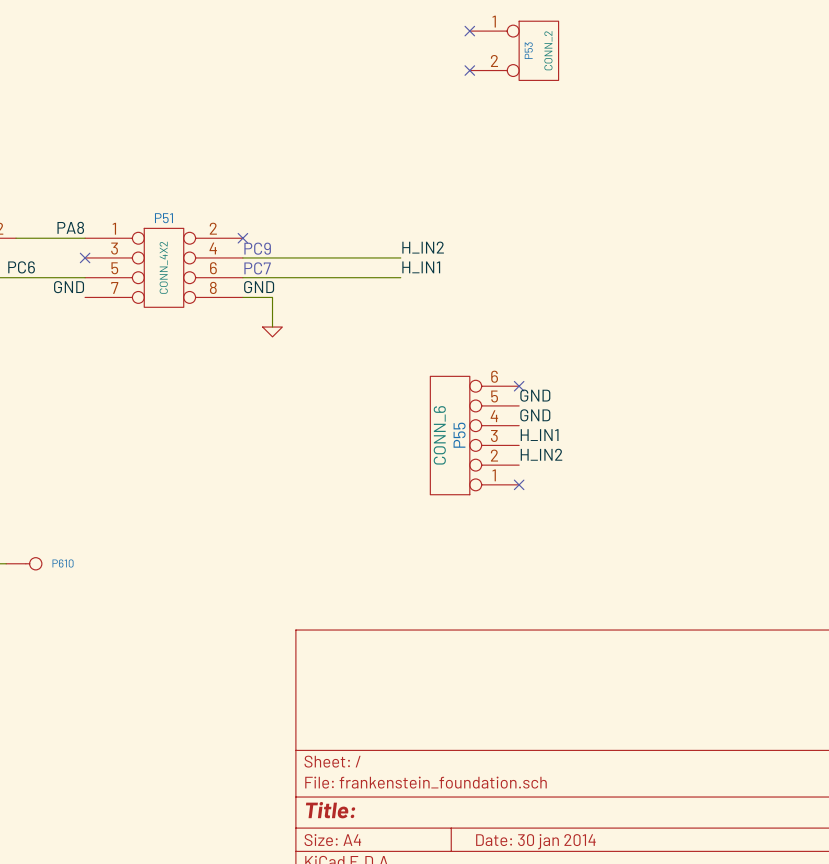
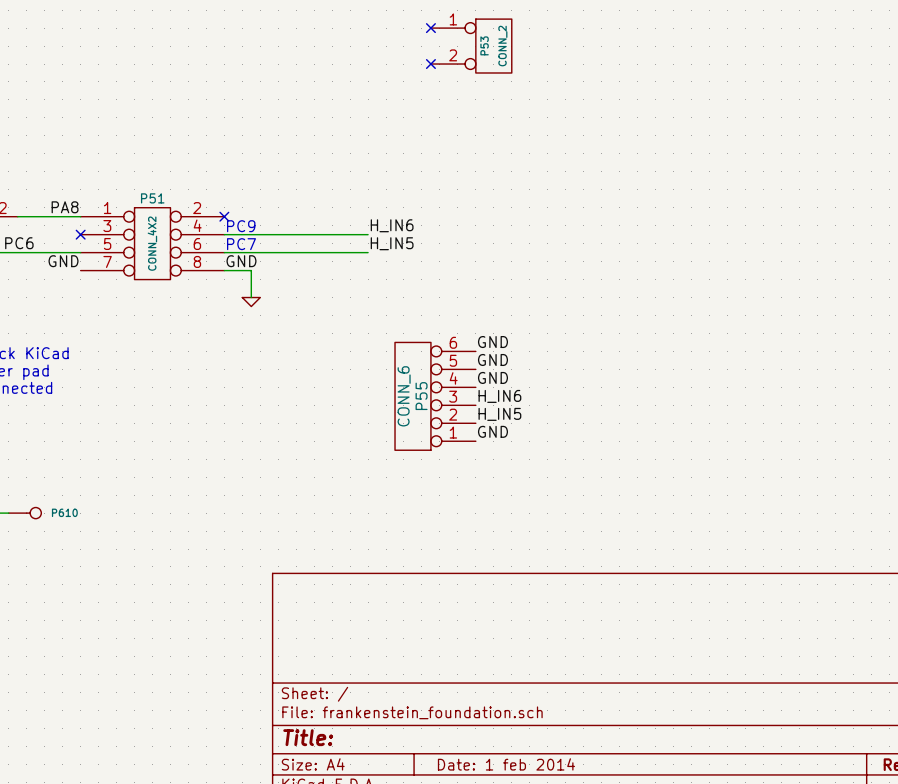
label: H_IN2 (423, 247) -> H_IN6 (392, 225)
label: H_IN1 (421, 267) -> H_IN5 (392, 243)
label: none -> GND (492, 342)
no-connect mark: (519, 386) -> none
label: H_IN1 (539, 435) -> H_IN6 (499, 396)
label: H_IN2 (541, 454) -> H_IN5 (499, 414)
label: none -> GND (492, 431)
no-connect mark: (519, 484) -> none
title block: Date: 30 jan 2014 (535, 841) -> Date: 1 feb 2014 (506, 764)

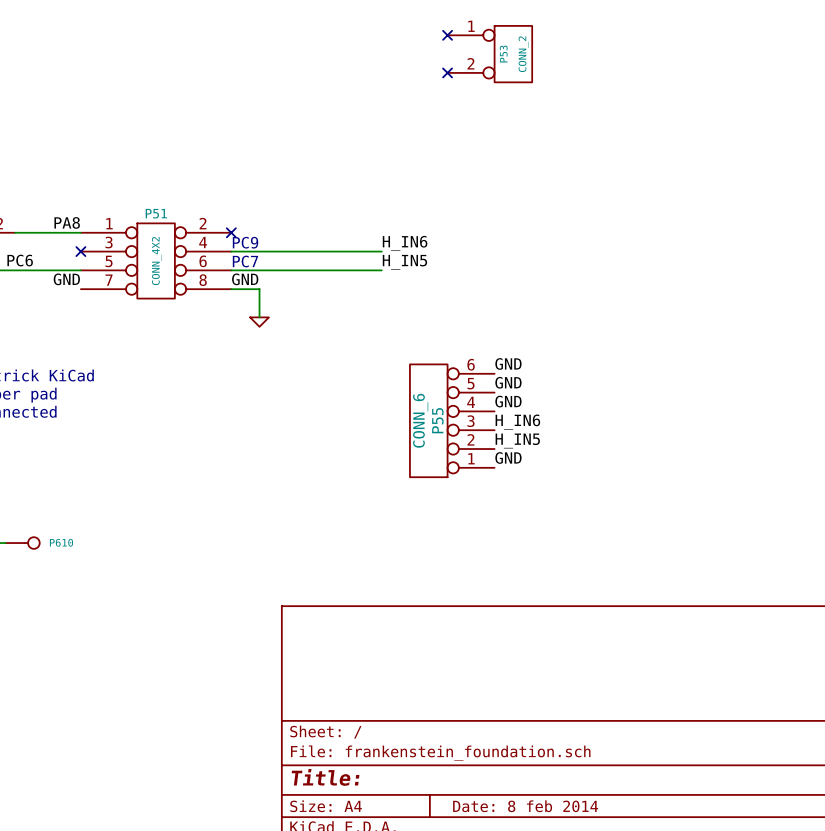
title block: Date: 1 feb 2014 (506, 764) -> Date: 8 feb 2014 (525, 806)

